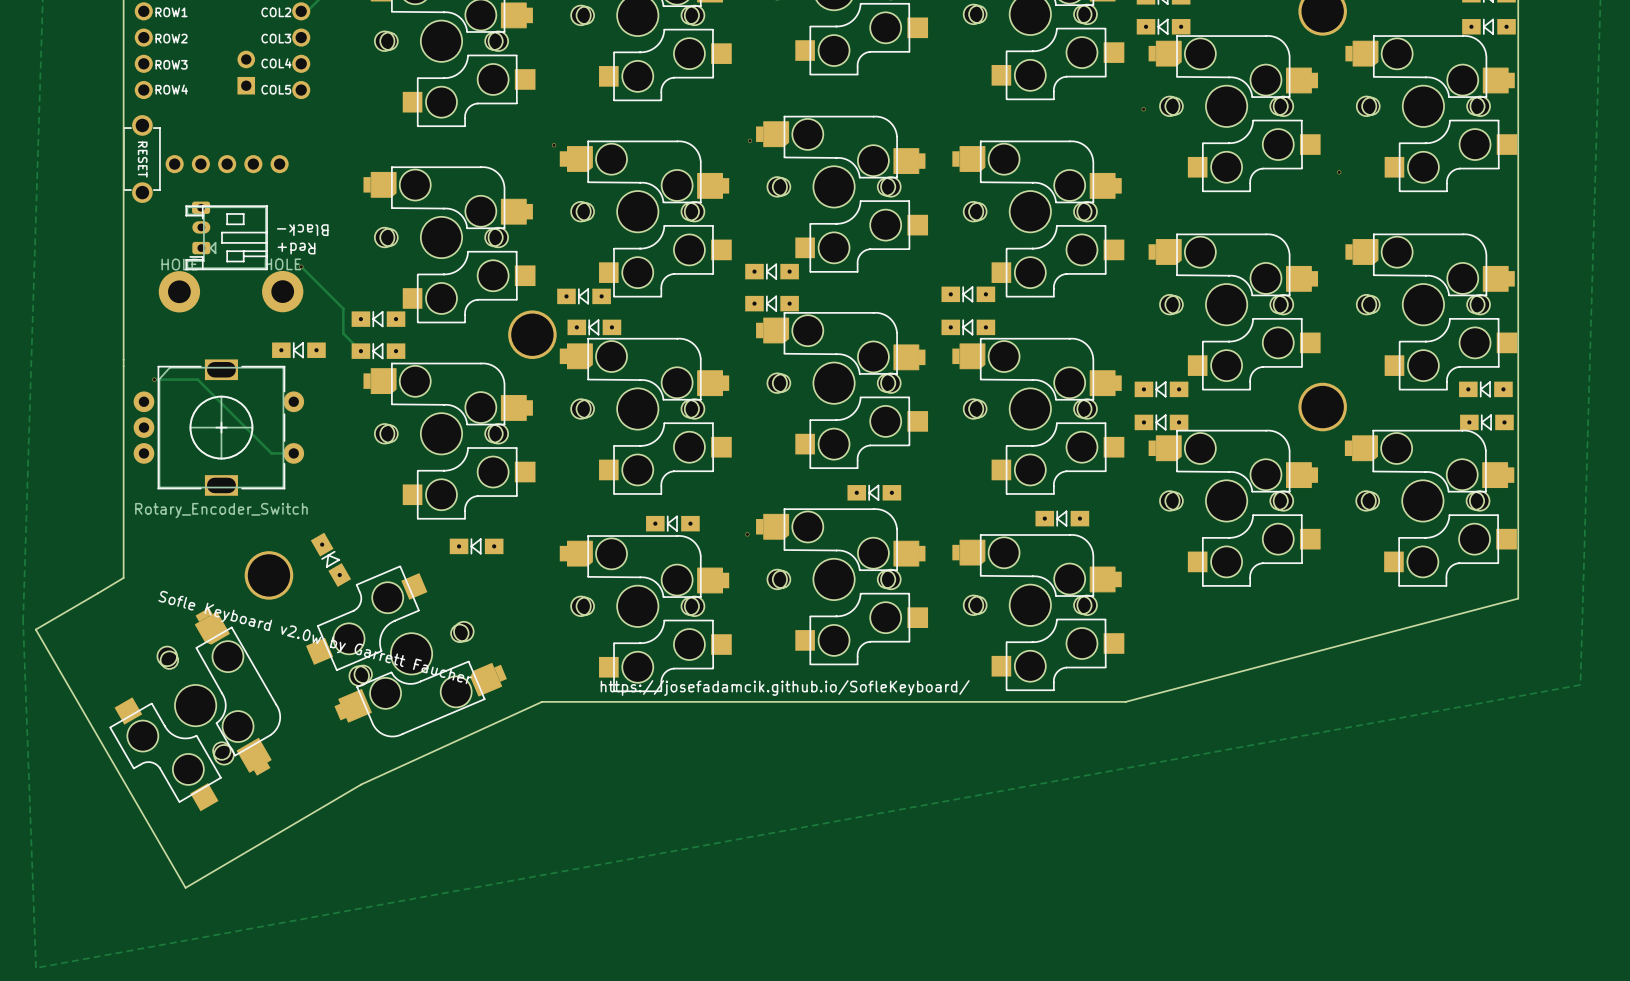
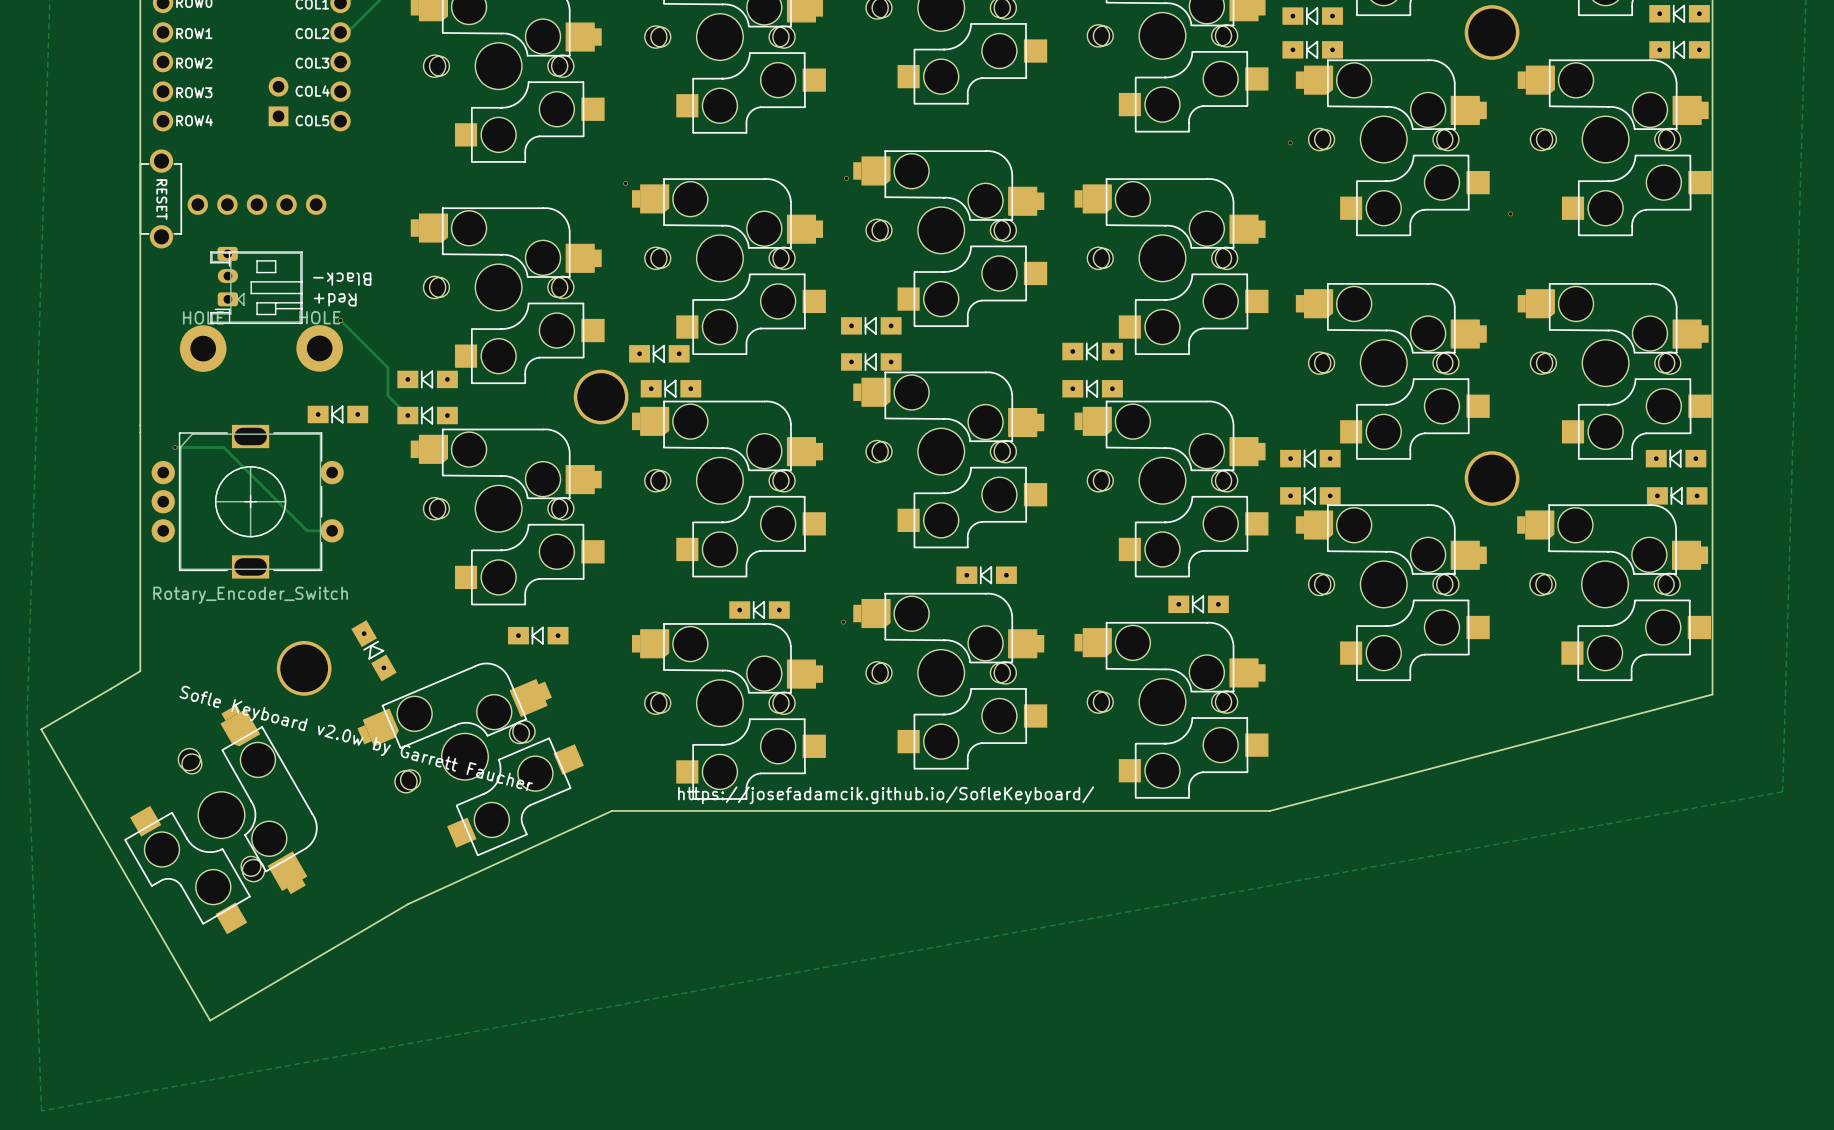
part rotation: 0° (406, 651) -> 180° (470, 759)

